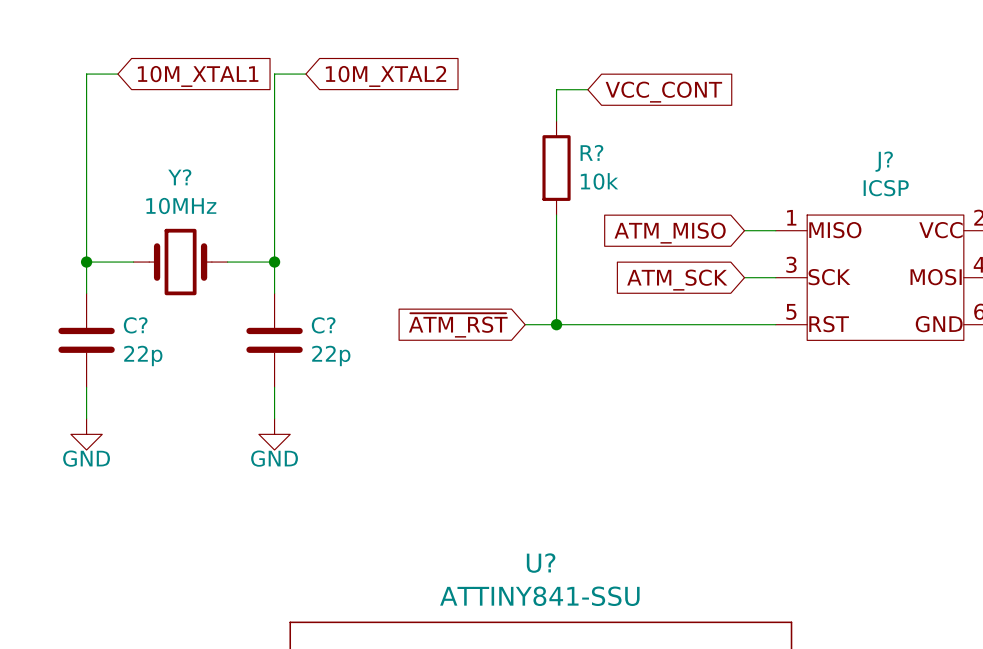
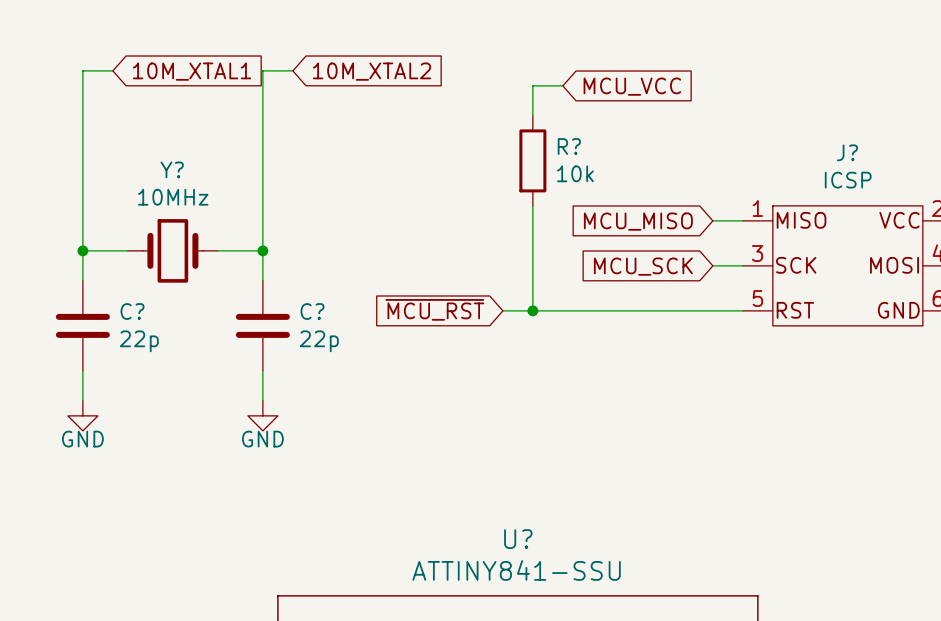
global label: VCC_CONT (663, 92) -> MCU_VCC (632, 86)
global label: ATM_MISO (670, 233) -> MCU_MISO (638, 221)
global label: ATM_SCK (677, 280) -> MCU_SCK (643, 266)
global label: ~{ATM_RST} (458, 325) -> ~{MCU_RST} (434, 309)

